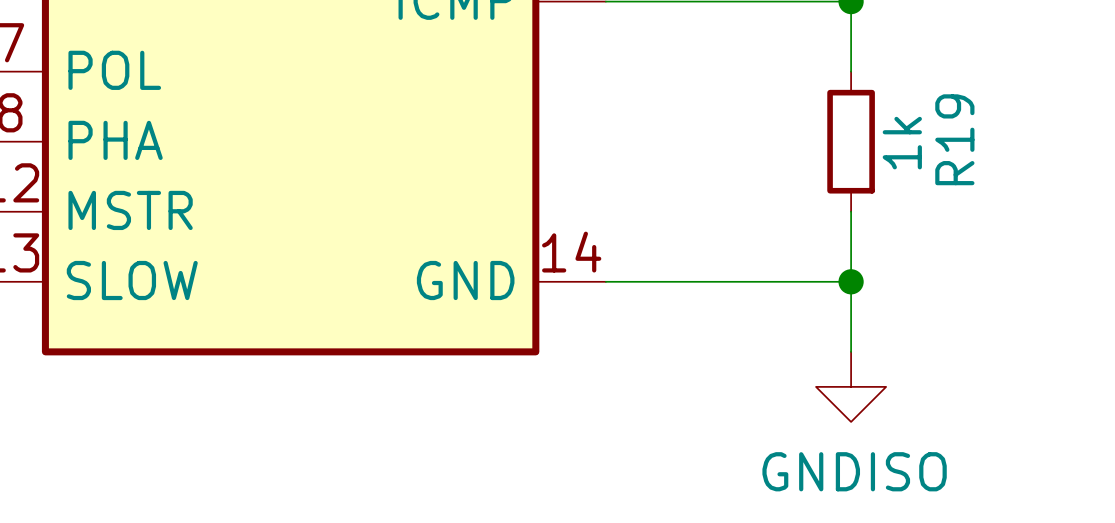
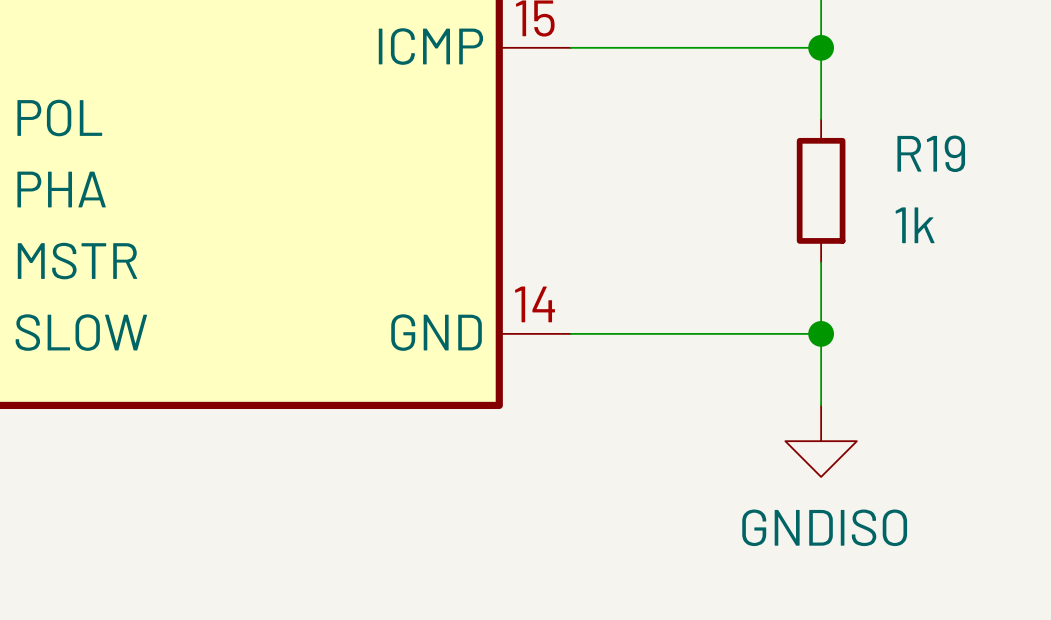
R19 name rotation: 0° (954, 139) -> 90° clockwise (931, 153)
R19 value rotation: 0° (902, 143) -> 90° clockwise (915, 225)

